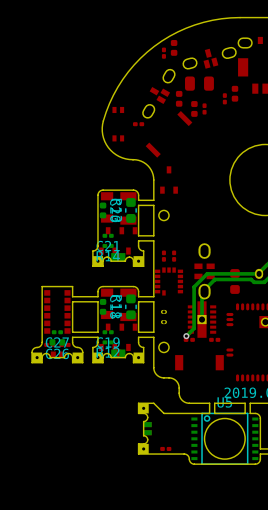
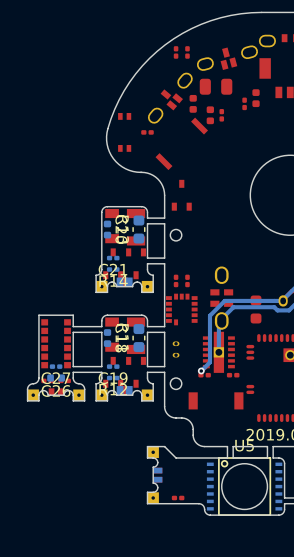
part footprint: [170, 40, 178, 56] -> [185, 46, 190, 59]
part rotation: 0° (158, 93) -> 10° clockwise (170, 98)

